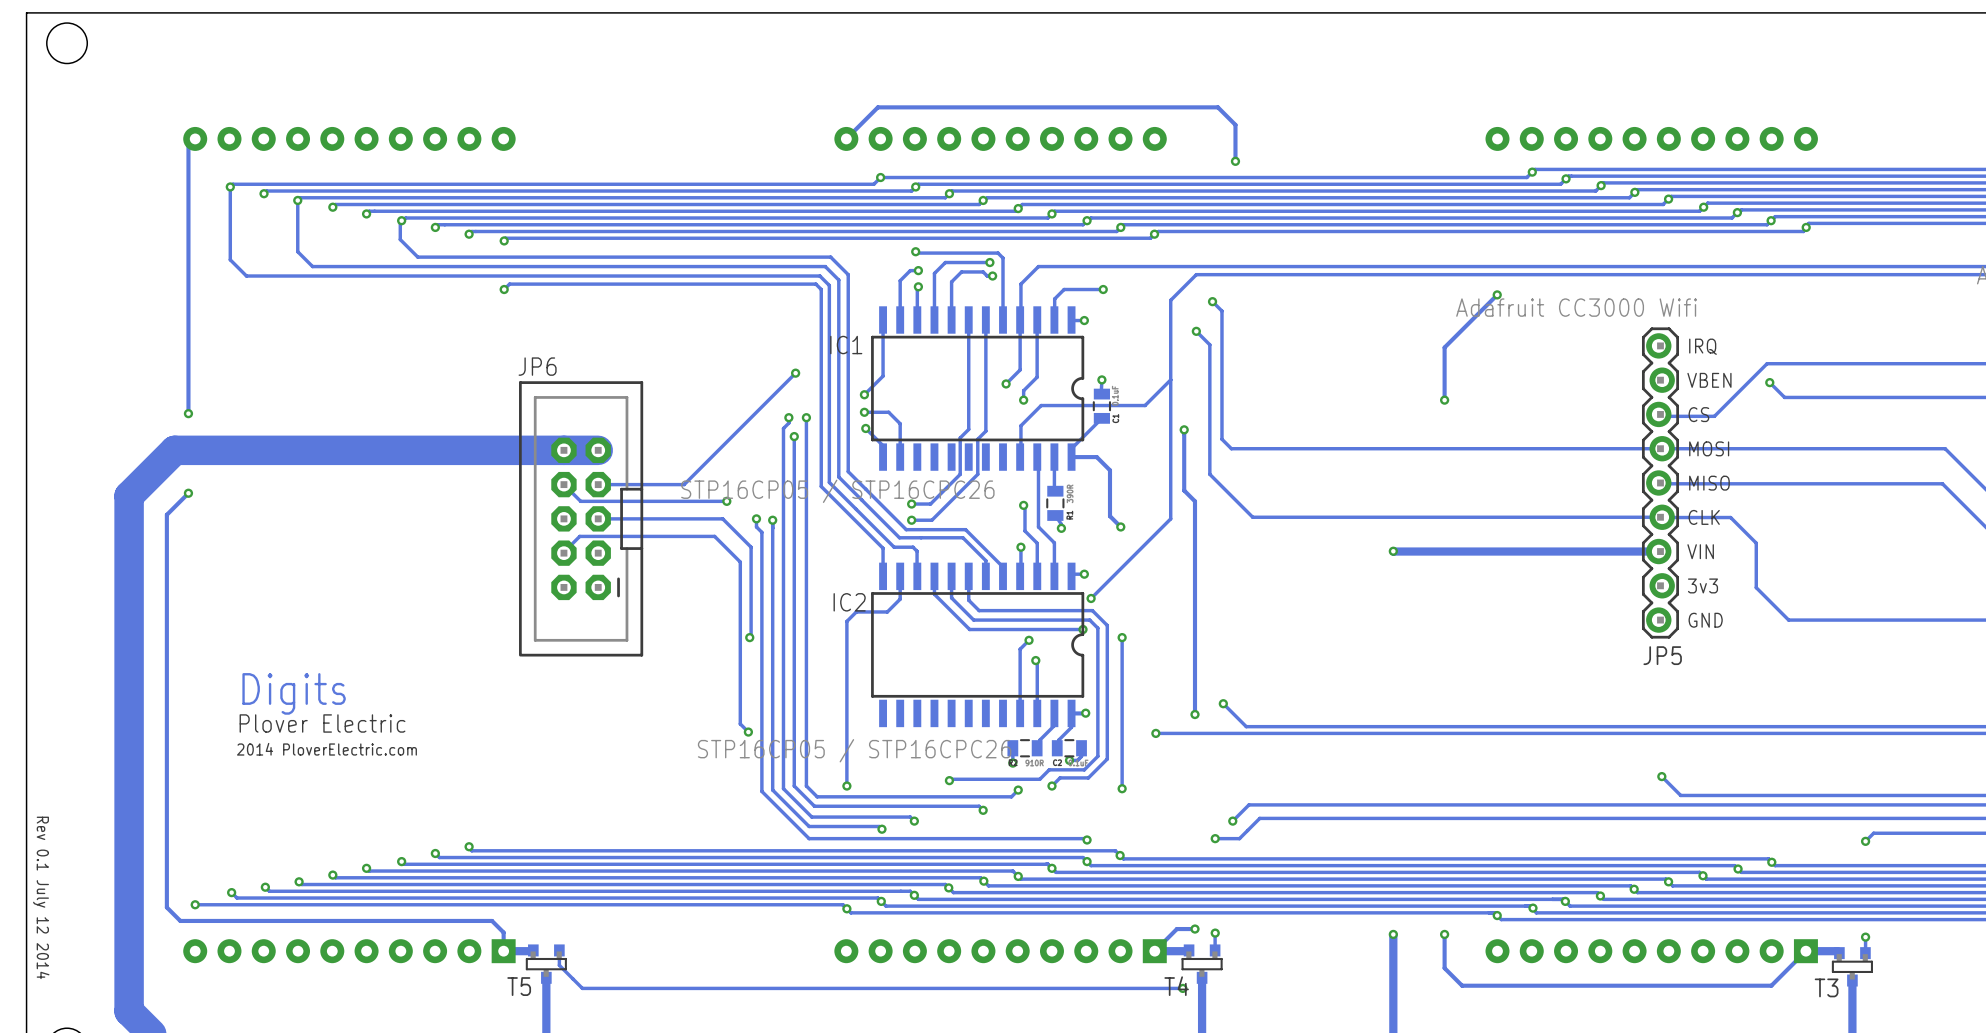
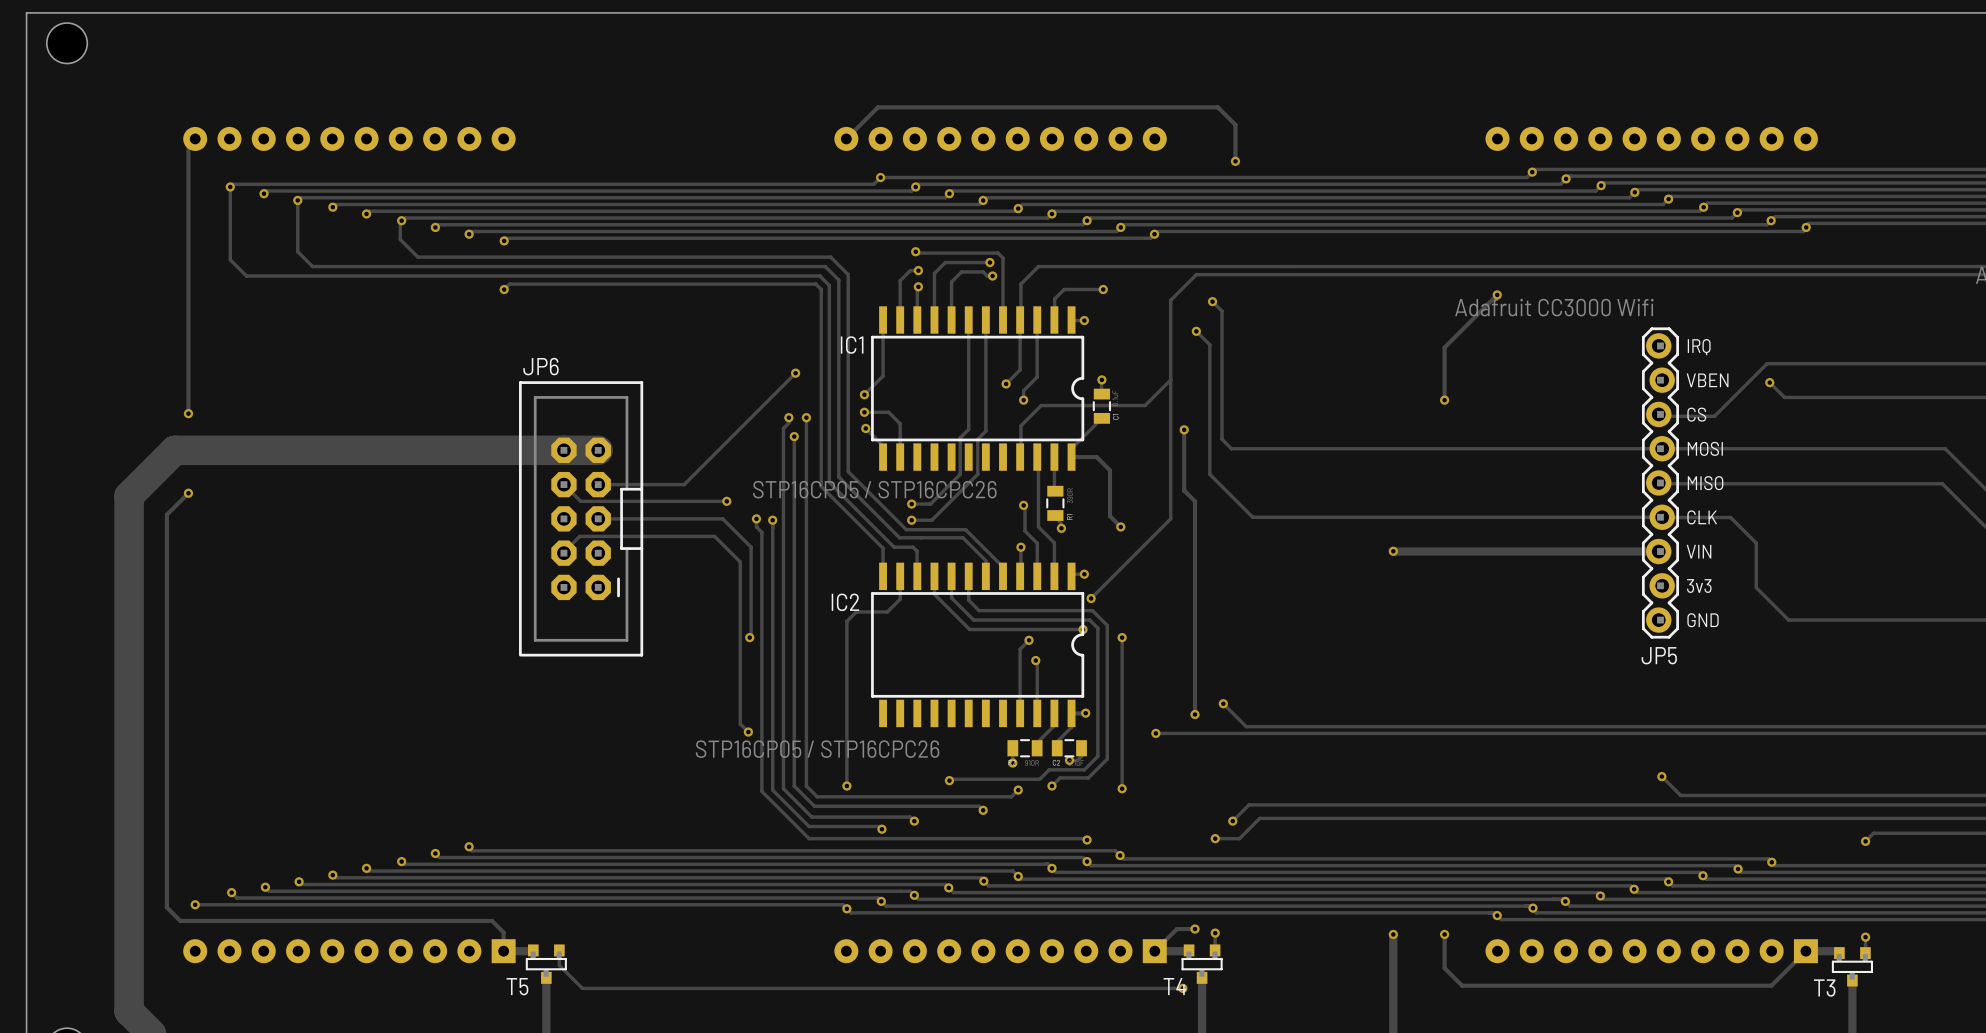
text: Digits (294, 693) -> none
text: Plover Electric (322, 723) -> none
text: 2014 PloverElectric.com (326, 749) -> none
text: Rev 0.1 July 12 2014 (41, 897) -> none

